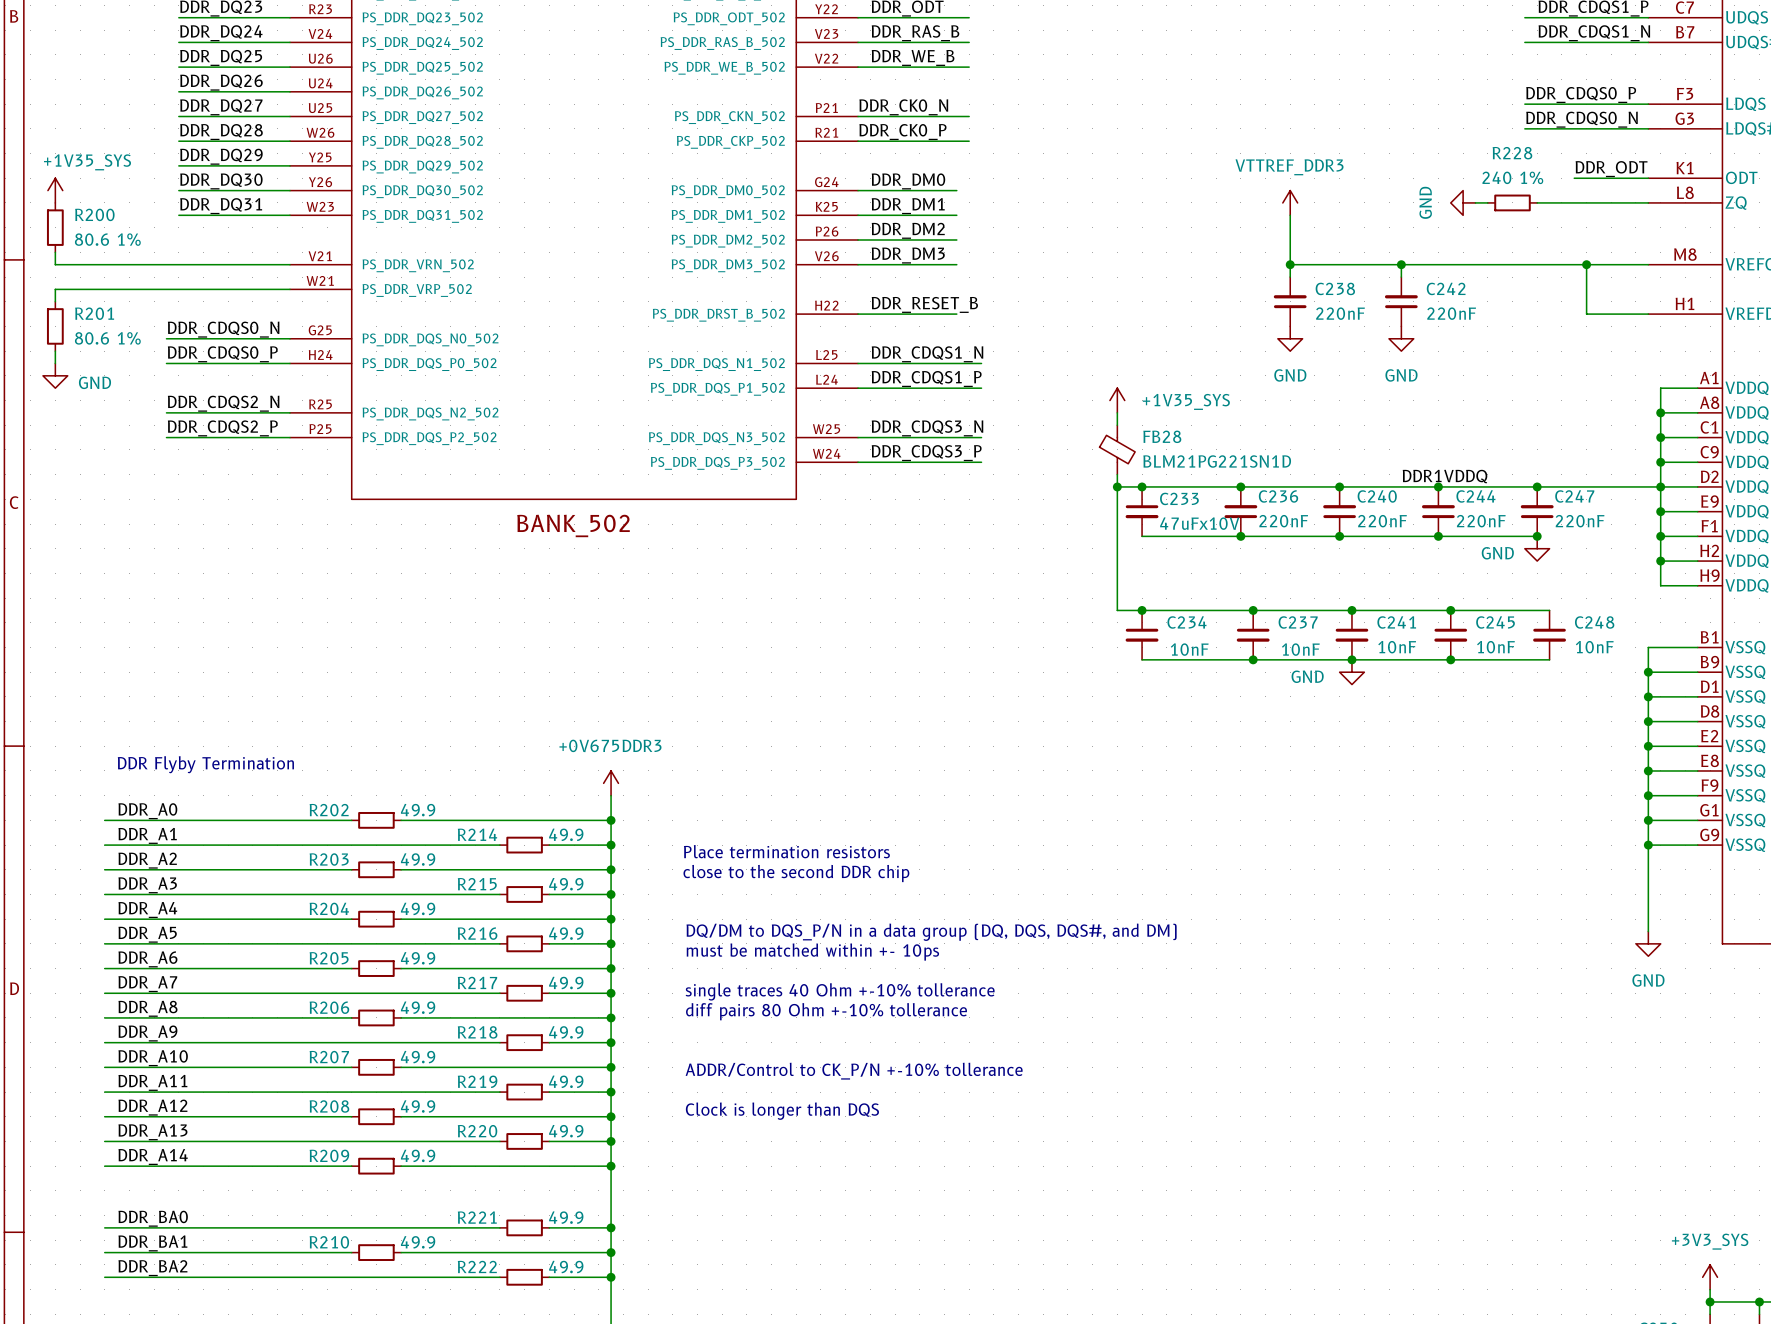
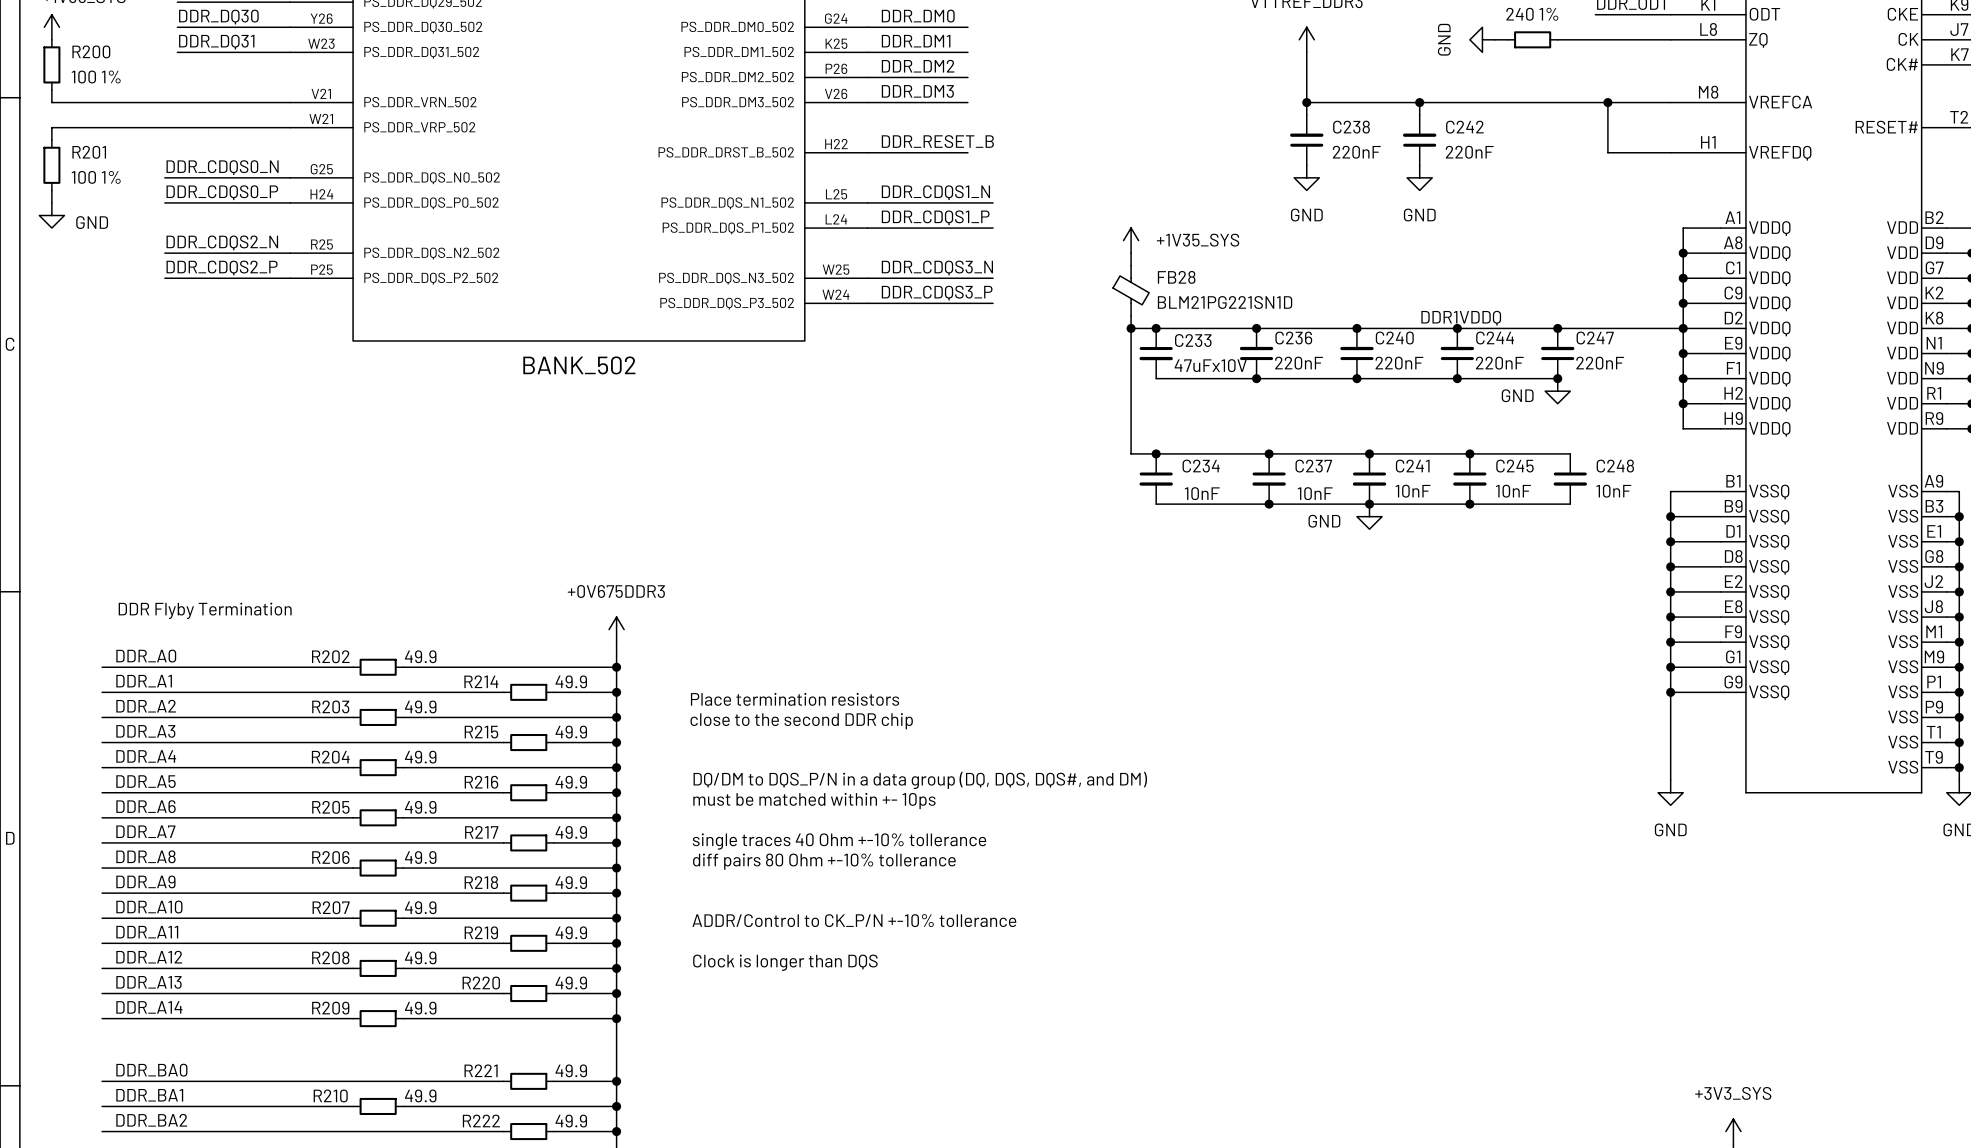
R200 value: 80.6 1% (107, 239) -> 100 1% (96, 77)
R201 value: 80.6 1% (107, 338) -> 100 1% (96, 177)

